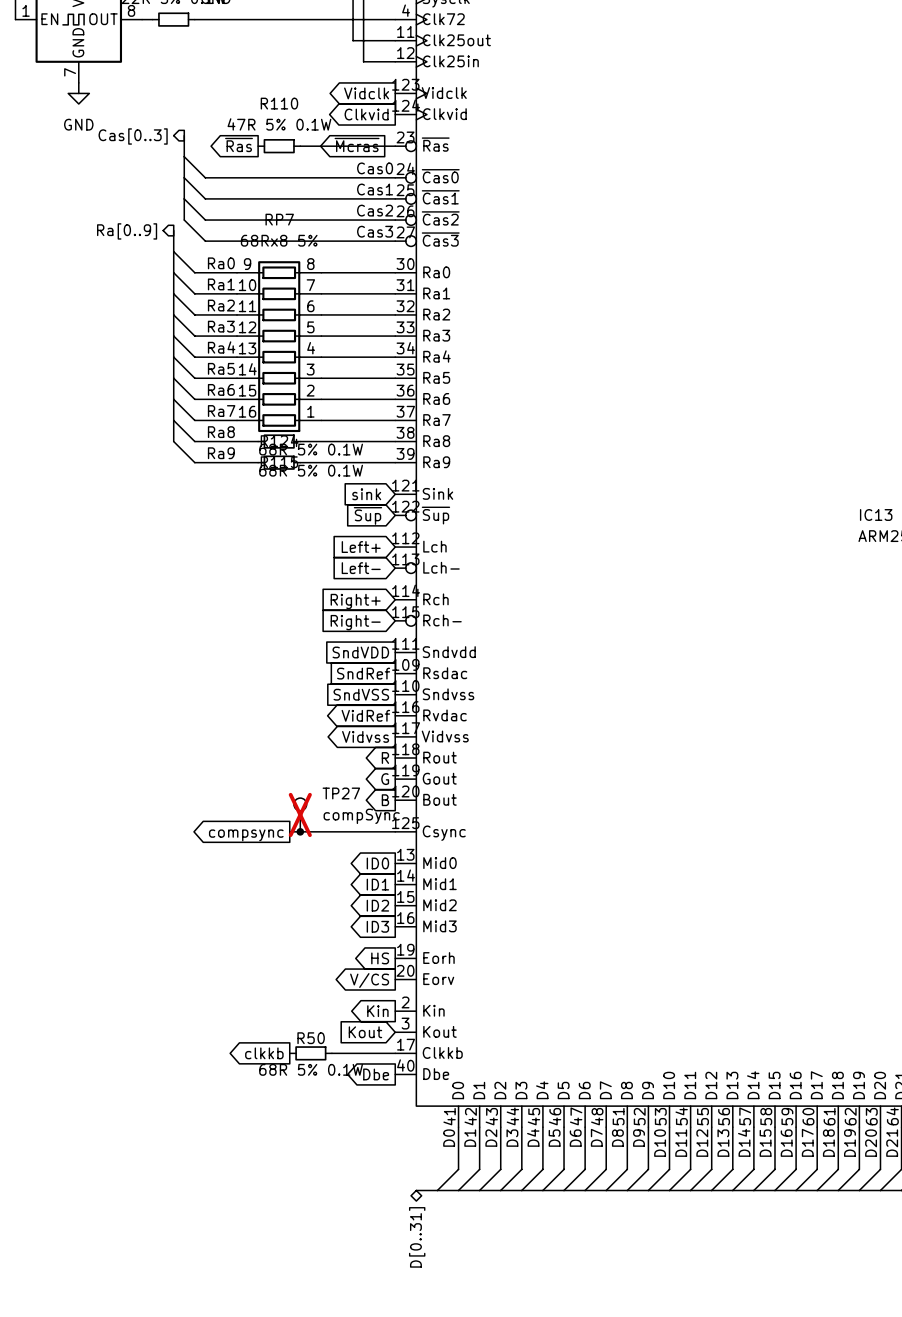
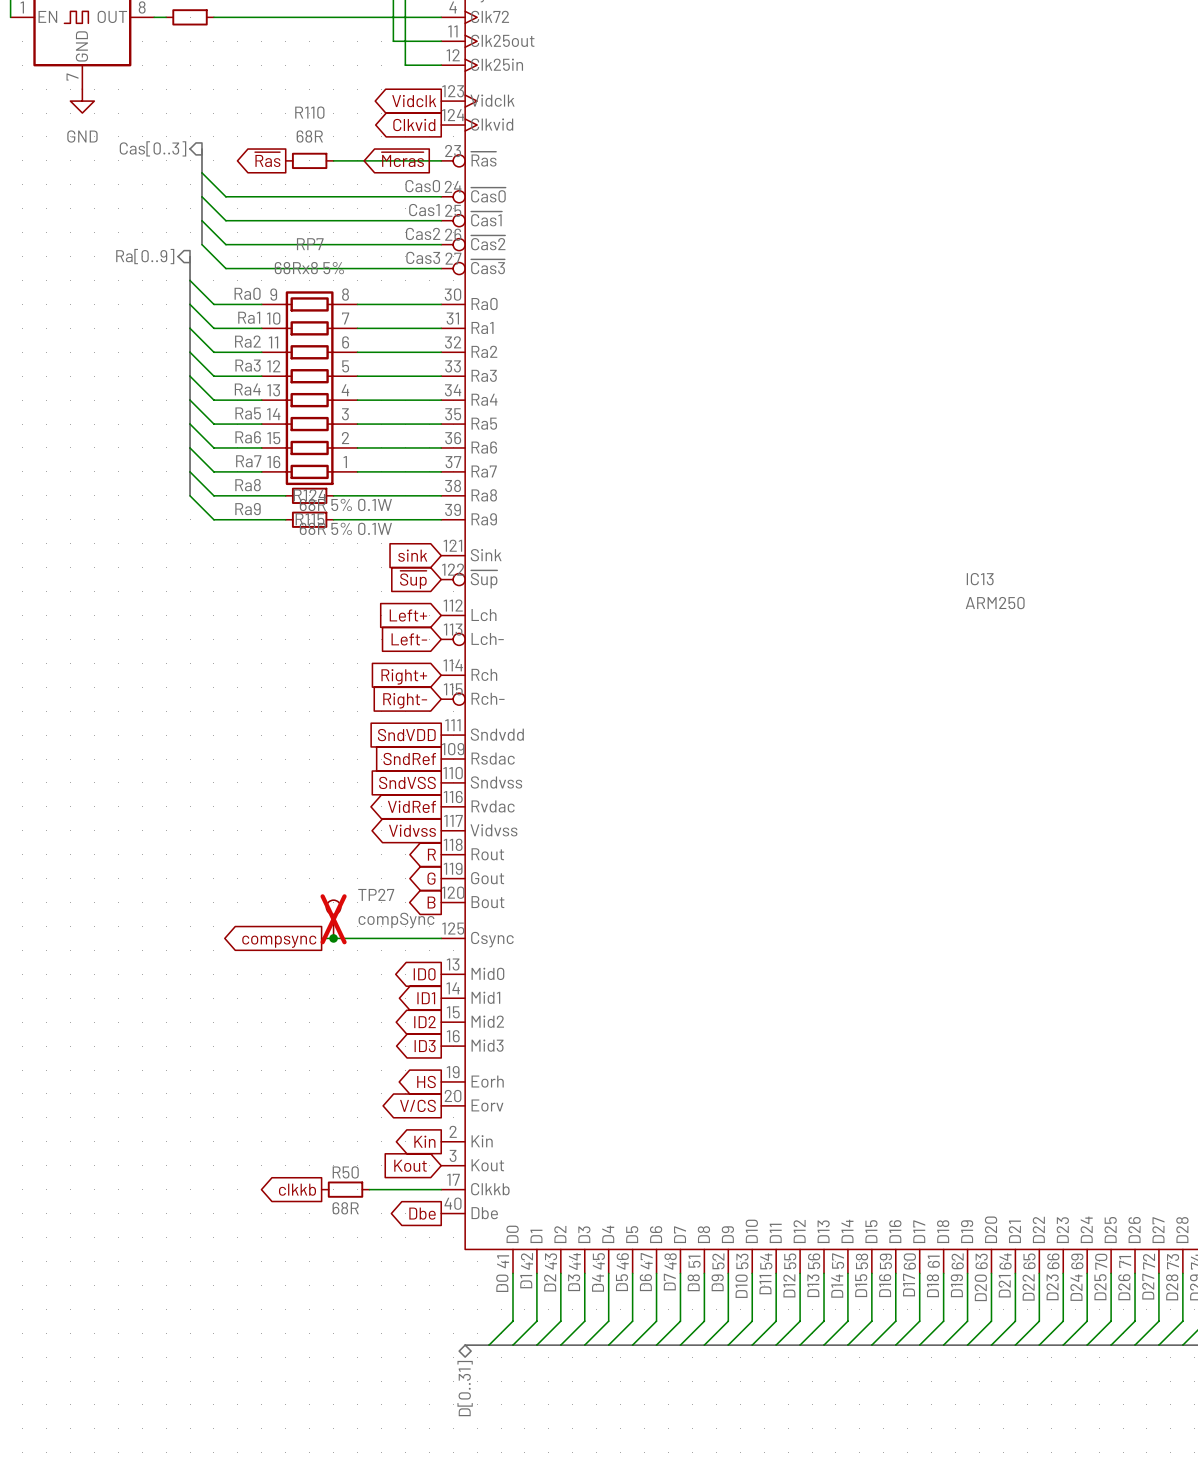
R110 value: 47R 5% 0.1W (279, 124) -> 68R (309, 136)
R50 value: 68R 5% 0.1W (311, 1069) -> 68R (345, 1208)

